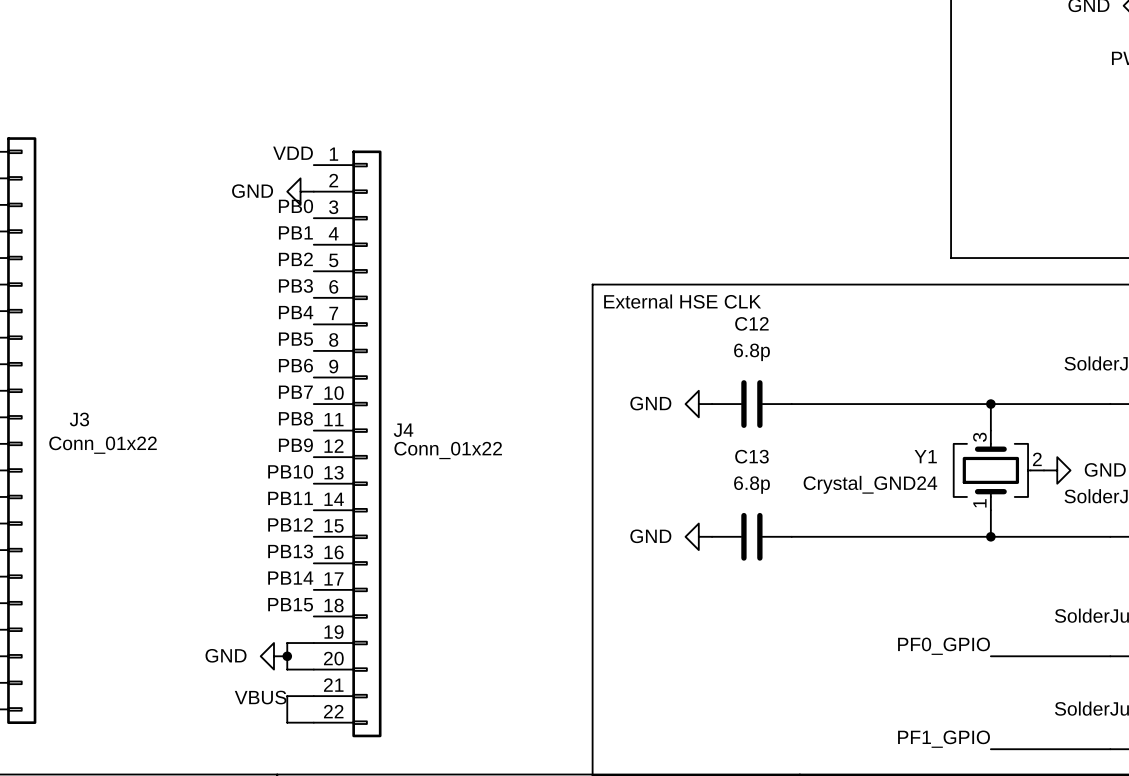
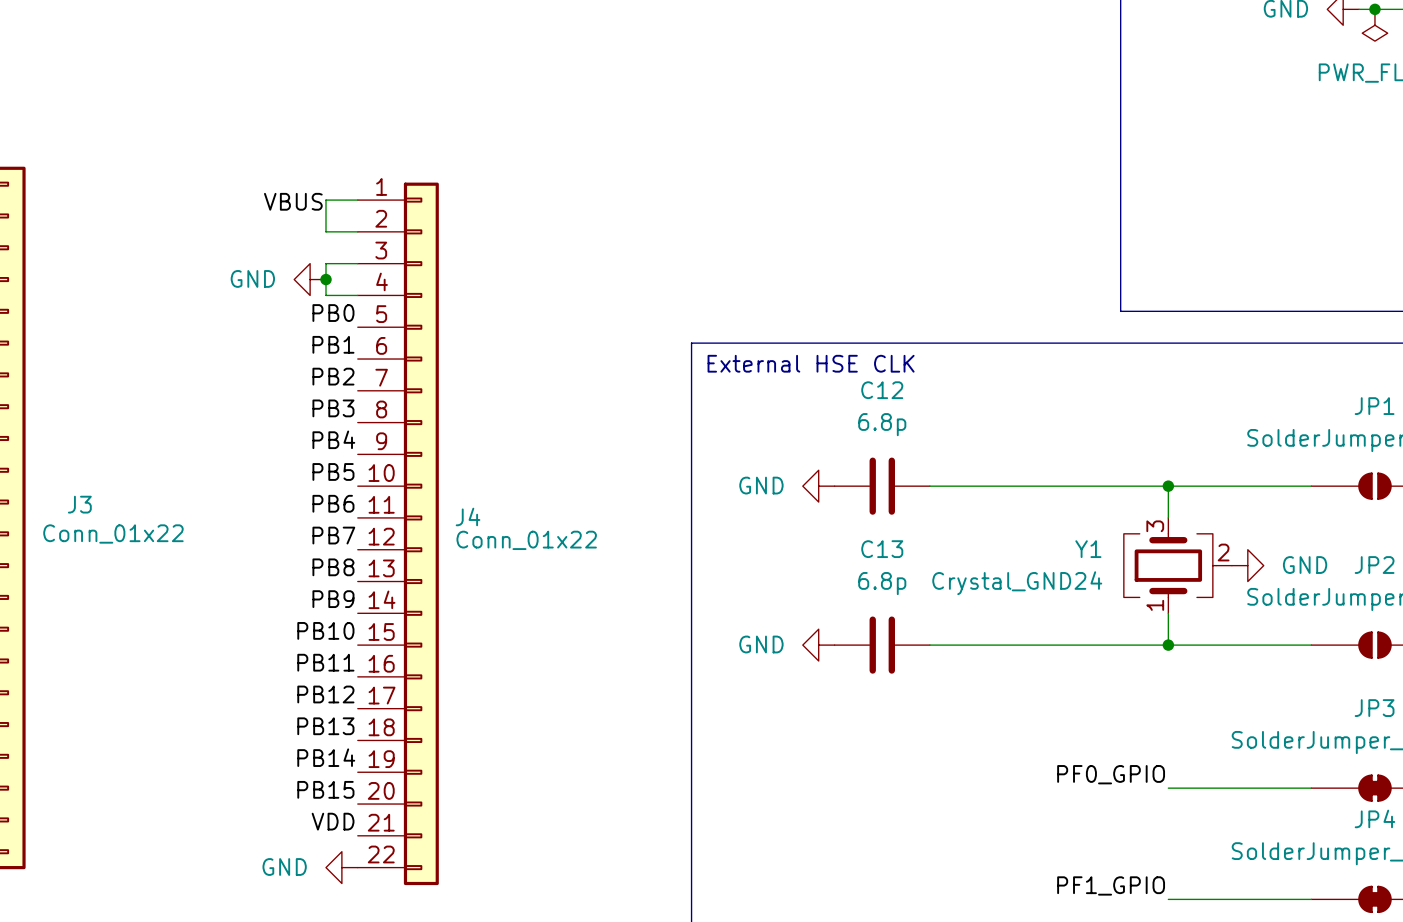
label: VDD (293, 153) -> none
wire: none -> (357, 200) (326, 200) (326, 231) (357, 231)
label: none -> VBUS (293, 201)
power symbol position: GND (300, 191) -> GND (310, 279)
label: PB0 (295, 206) -> none
wire: none -> (357, 263) (326, 263) (326, 295) (357, 295)
junction: none -> (326, 279)
label: PB1 (295, 232) -> none
label: PB2 (295, 259) -> PB0 (333, 313)
label: PB3 (295, 285) -> PB1 (333, 344)
label: PB4 (296, 312) -> PB2 (333, 376)
label: PB5 (295, 339) -> PB3 (333, 408)
label: PB6 (295, 365) -> PB4 (333, 439)
label: PB7 (295, 392) -> PB5 (333, 471)
label: PB8 (295, 418) -> PB6 (333, 503)
label: PB9 (295, 445) -> PB7 (333, 535)
label: PB10 (290, 471) -> PB8 (333, 567)
label: PB11 (290, 498) -> PB9 (333, 599)
label: PB12 (290, 524) -> PB10 (325, 630)
label: PB13 (290, 551) -> PB11 (325, 662)
label: PB14 (290, 578) -> PB12 (325, 694)
label: PB15 (290, 604) -> PB13 (325, 726)
label: none -> PB14 (326, 757)
wire: (313, 643) (287, 643) (287, 669) (313, 669) -> none
power symbol position: GND (273, 656) -> GND (341, 867)
junction: (287, 656) -> none
label: none -> PB15 (325, 789)
label: none -> VDD (333, 821)
wire: (313, 696) (287, 696) (287, 722) (313, 722) -> none
label: VBUS (260, 697) -> none

